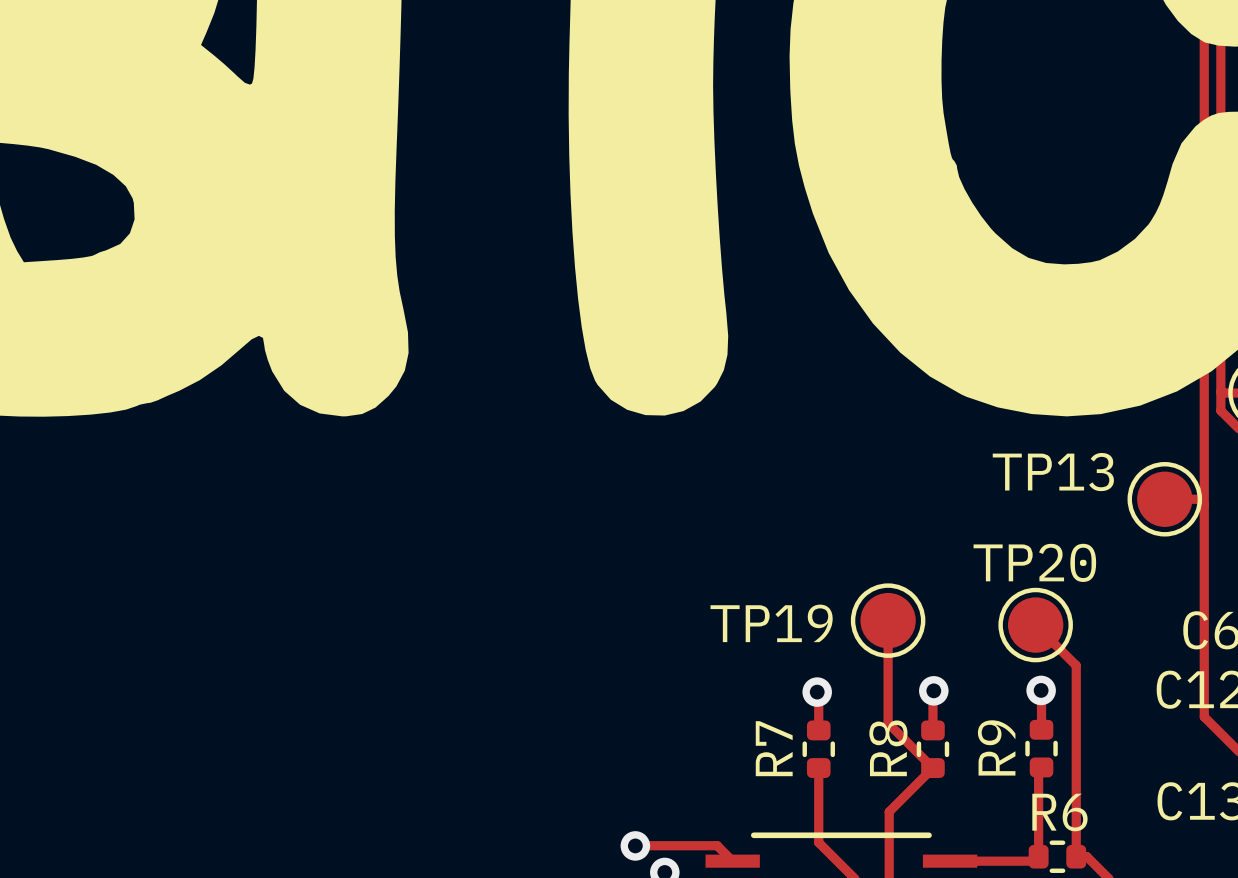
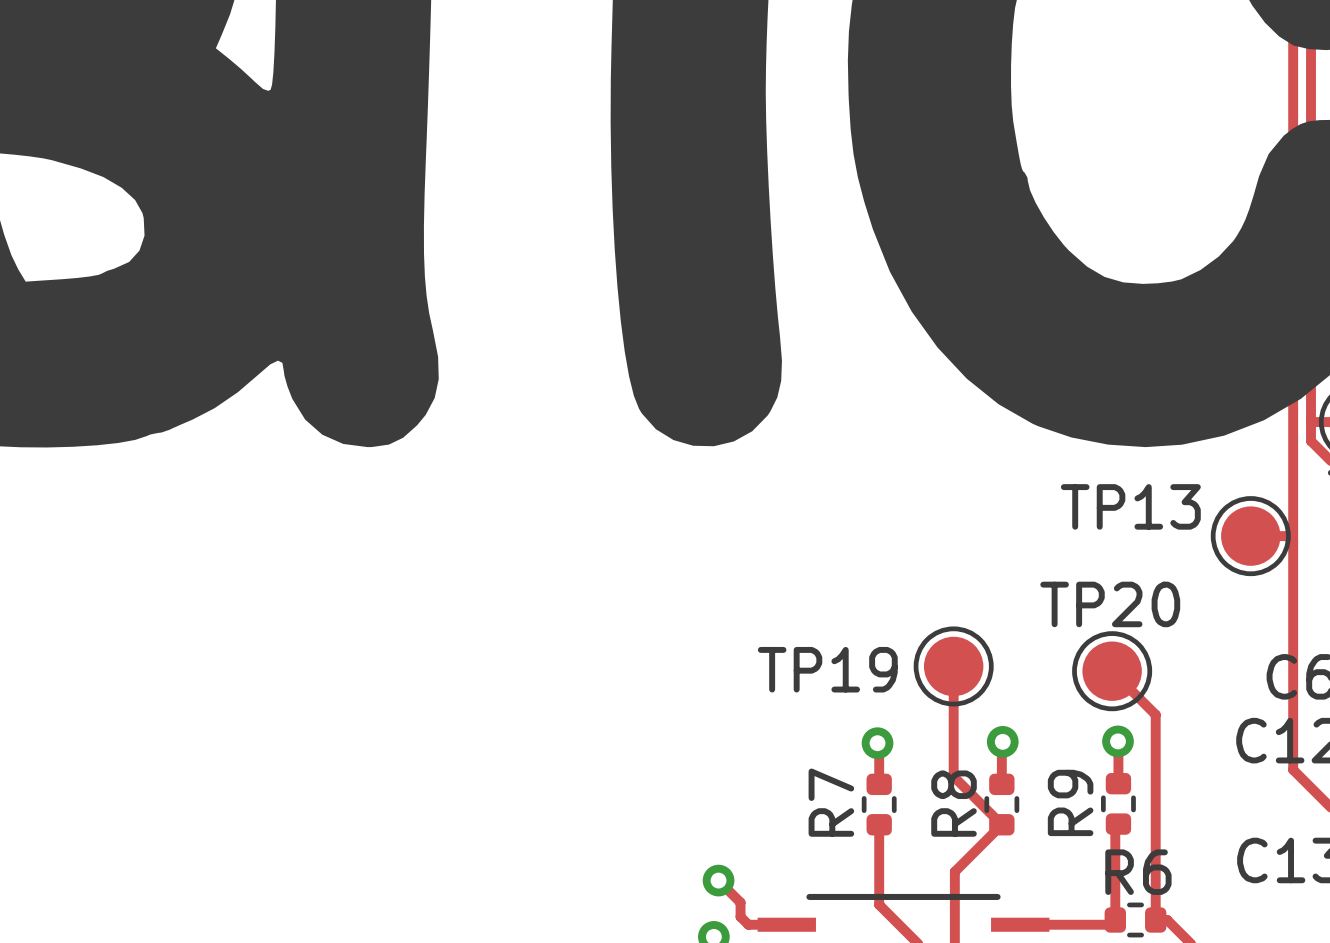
via: none -> (718, 880)
track: (635, 845) (717, 845) (732, 861) -> (718, 880) (740, 902) (740, 916) (748, 924) (786, 924)
via: (635, 845) -> none

